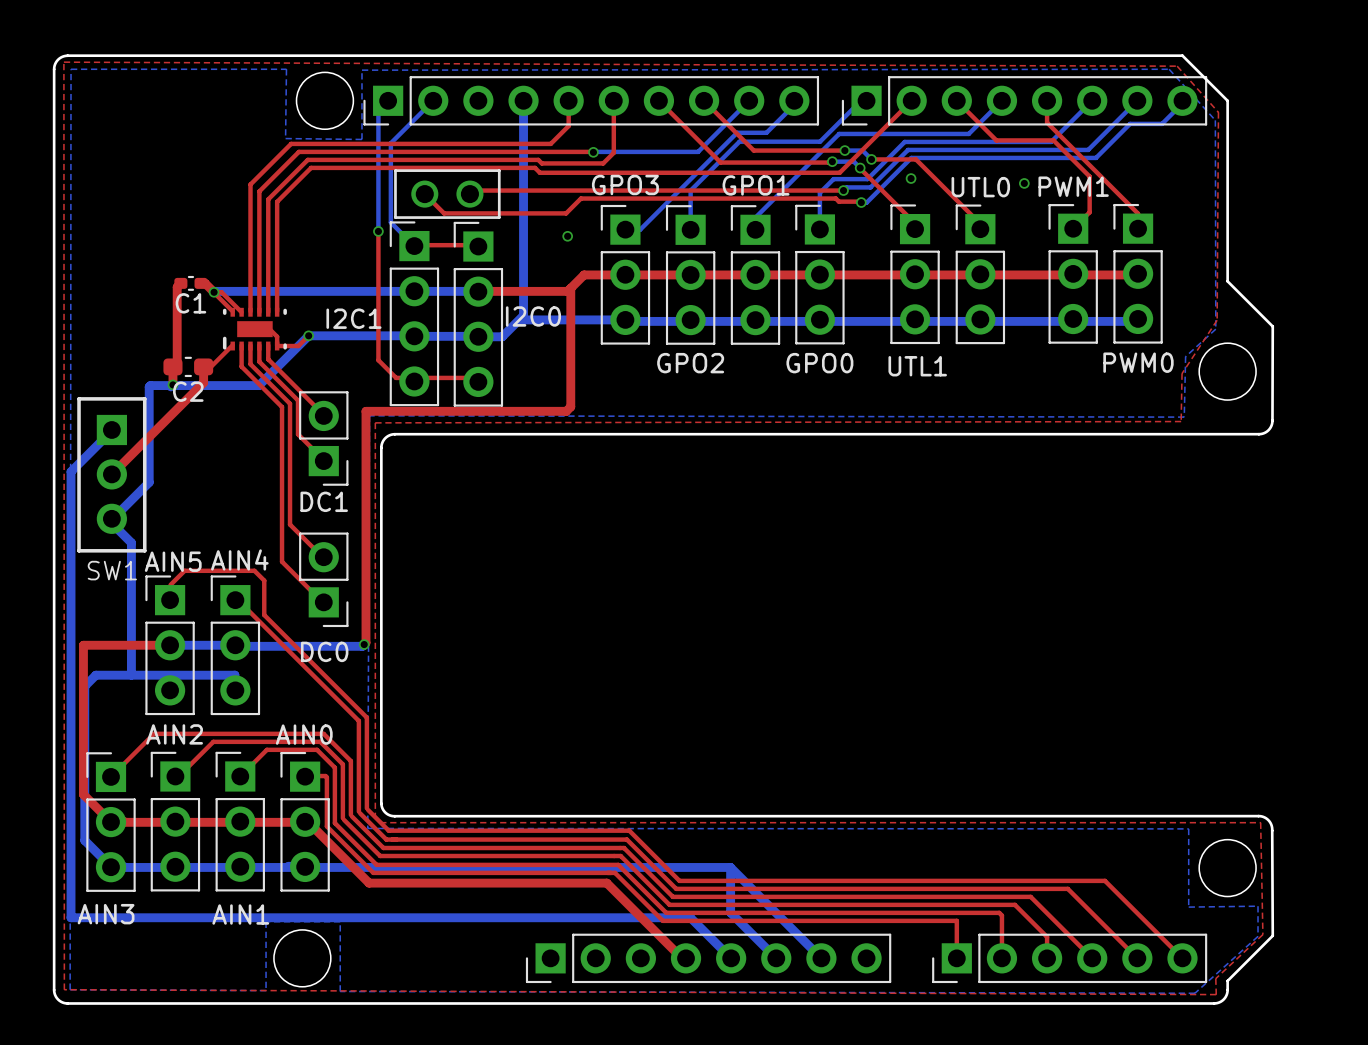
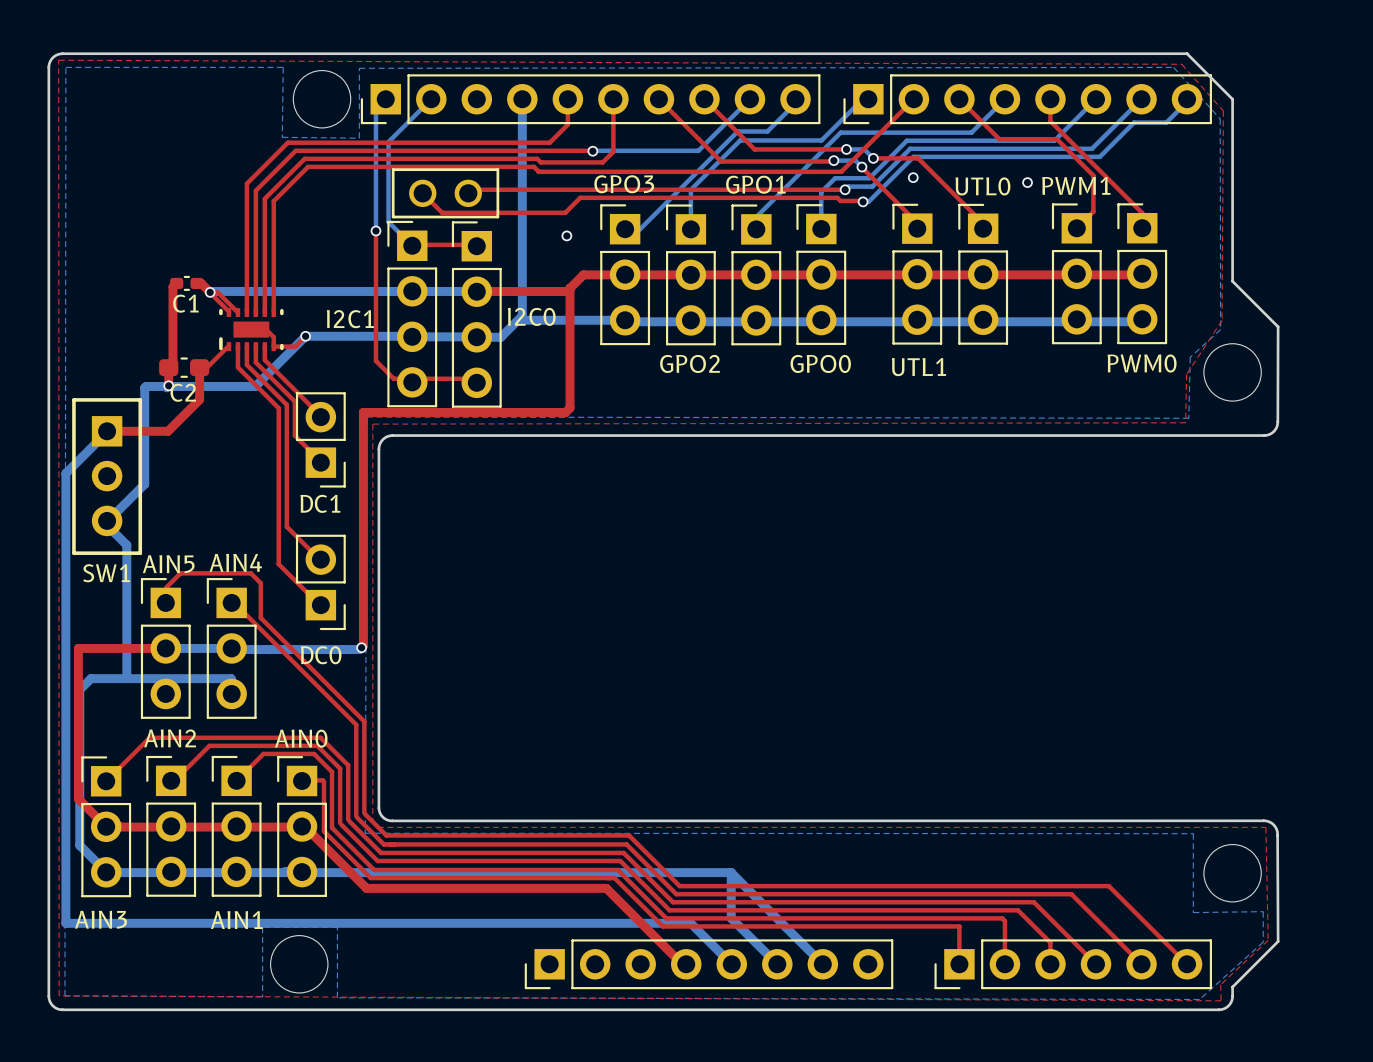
top track: (203, 382) (111, 474) -> (199, 383) (199, 399) (168, 431) (107, 431)

